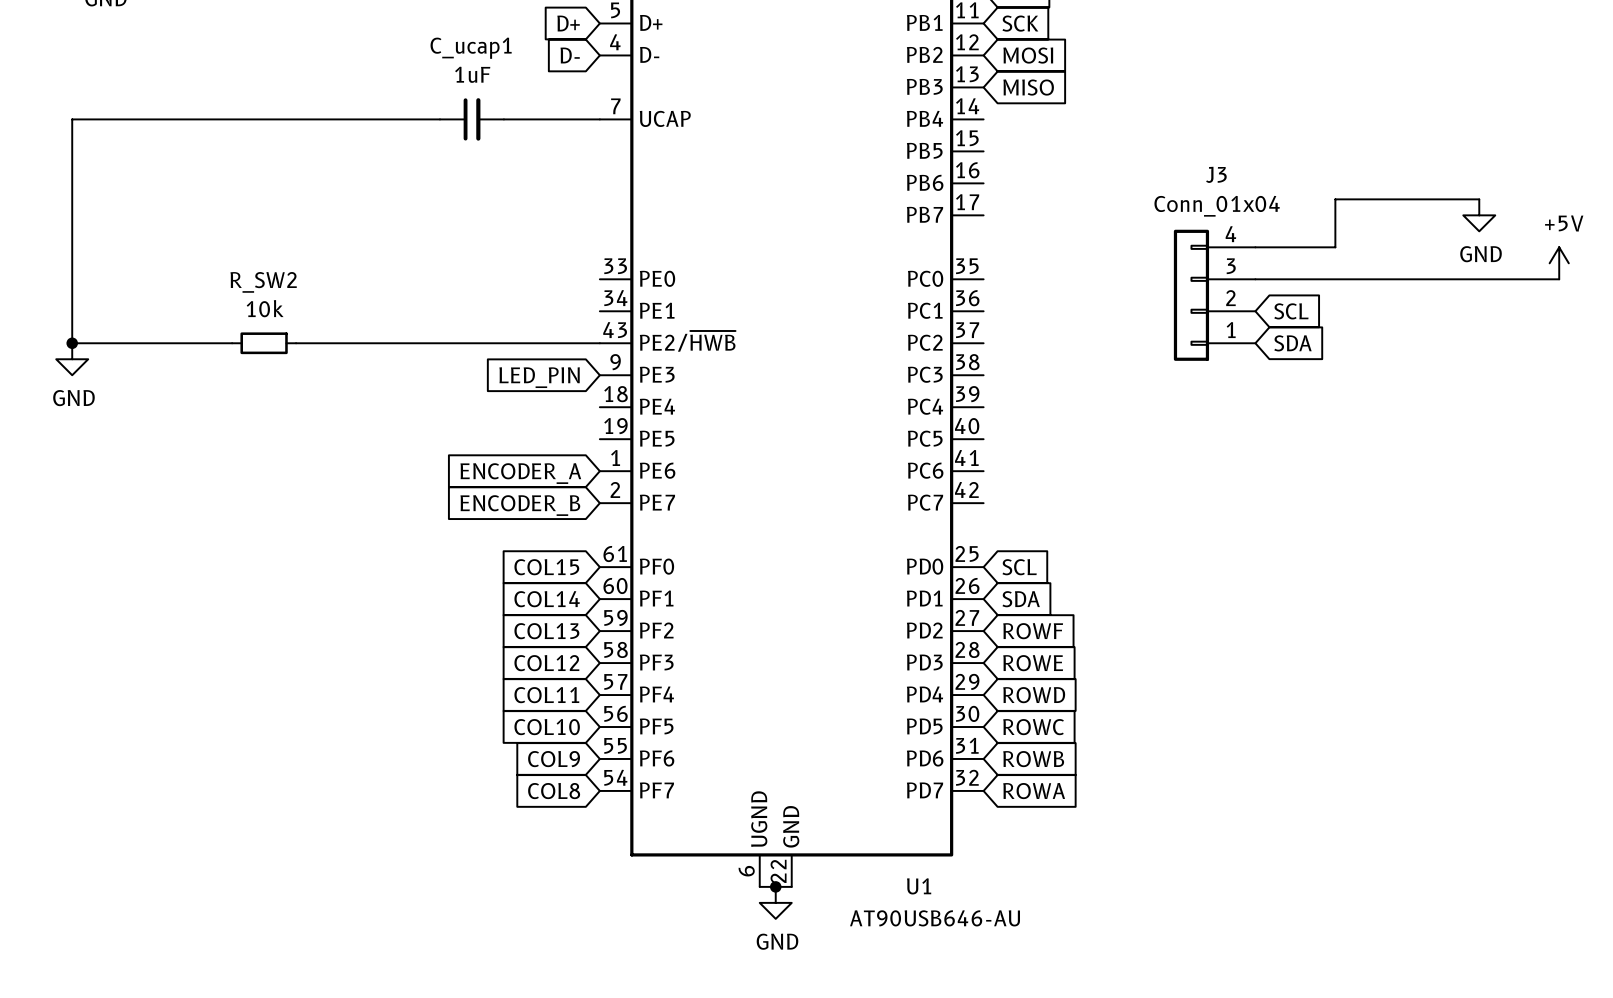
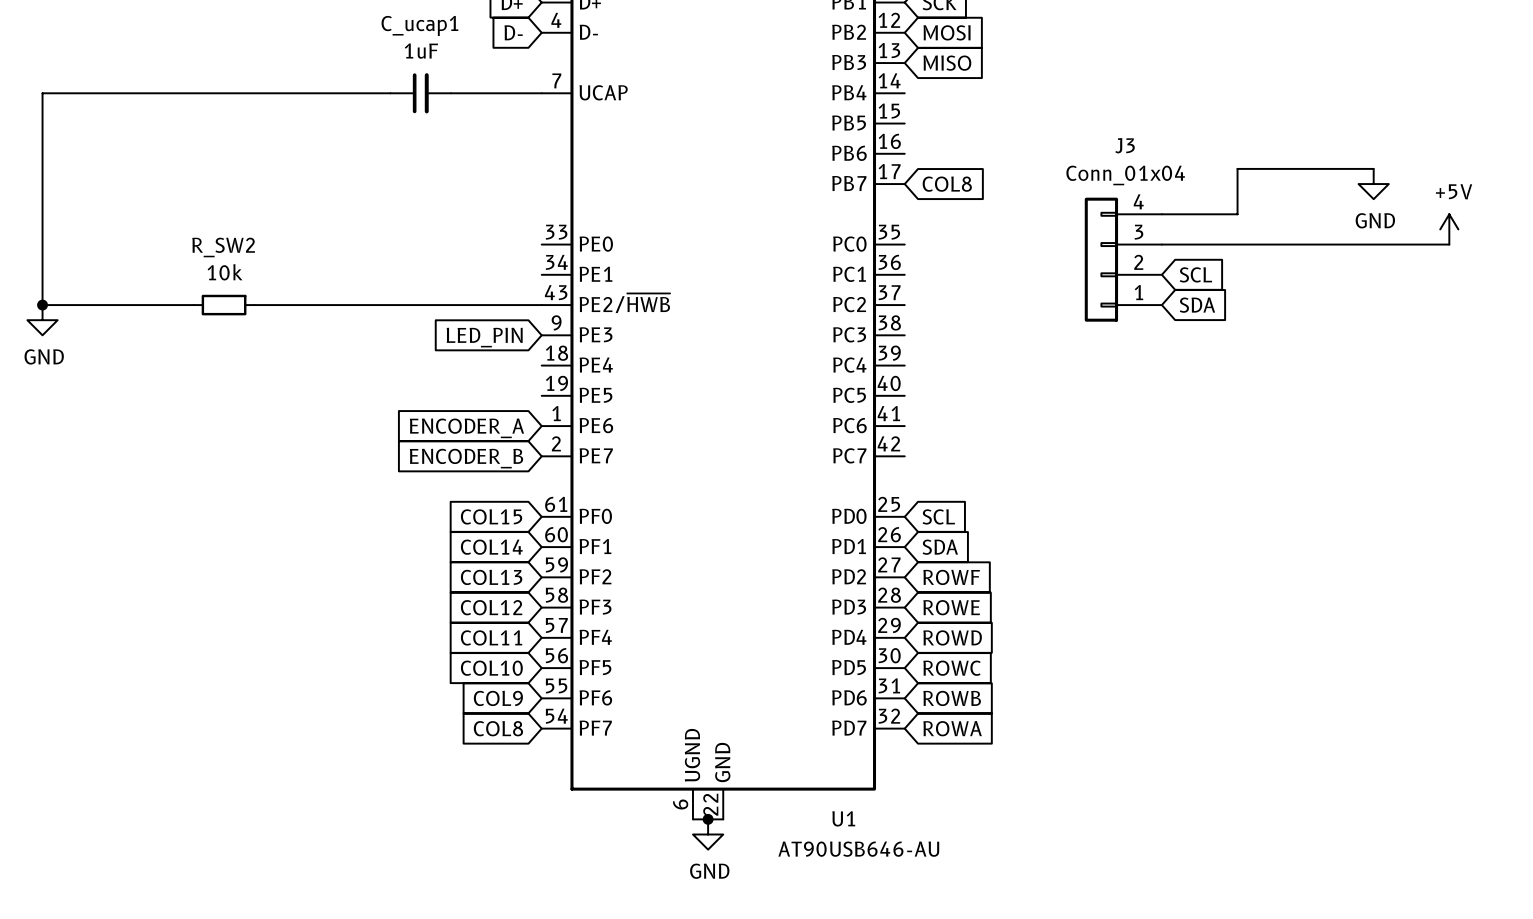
global label: none -> COL8 (947, 184)

